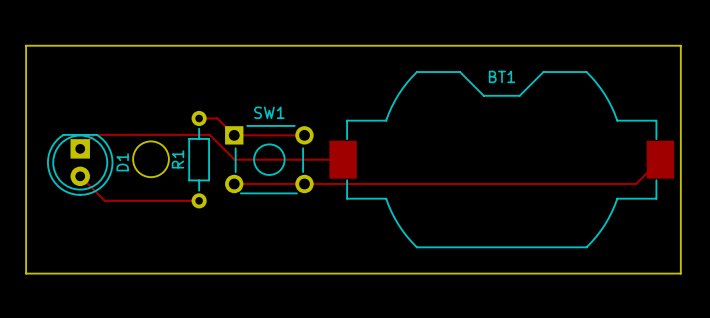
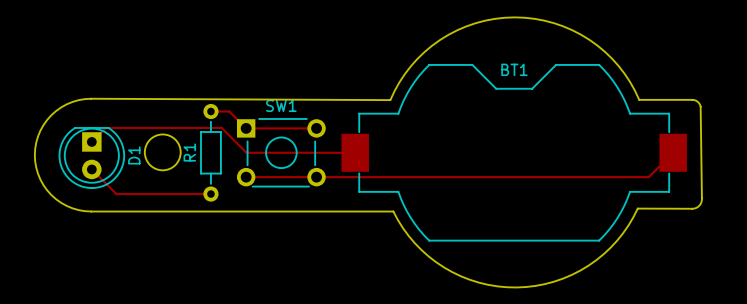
board edge: (26, 45) (680, 45) (680, 273) (26, 273) (26, 45) -> none
board edge: none -> (700, 106) (701, 197)
board edge: none -> (700, 106) (698, 102) (693, 99) (639, 99) (624, 74) (612, 58) (581, 34) (544, 20) (504, 17) (466, 26) (432, 45) (404, 74) (390, 100) (84, 99) (66, 104) (51, 115) (38, 136) (34, 155) (38, 173) (51, 195) (66, 205) (84, 211) (393, 211) (414, 243) (443, 267) (478, 282) (506, 287) (544, 284) (580, 270) (603, 254) (617, 240) (637, 208) (693, 208) (699, 205) (701, 197)

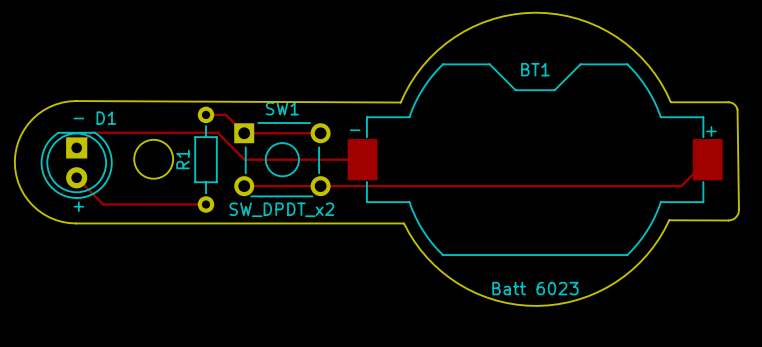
text: none -> - (78, 118)
text: none -> - (355, 130)
text: none -> + (711, 131)
D1 name rotation: 0° (134, 155) -> 90° clockwise (106, 118)
D1 name position: D1 (134, 155) -> D1 (106, 118)
text: none -> + (78, 206)
SW1 value: none -> SW_DPDT_x2 (281, 209)
BT1 value: none -> Batt 6023 (535, 288)

